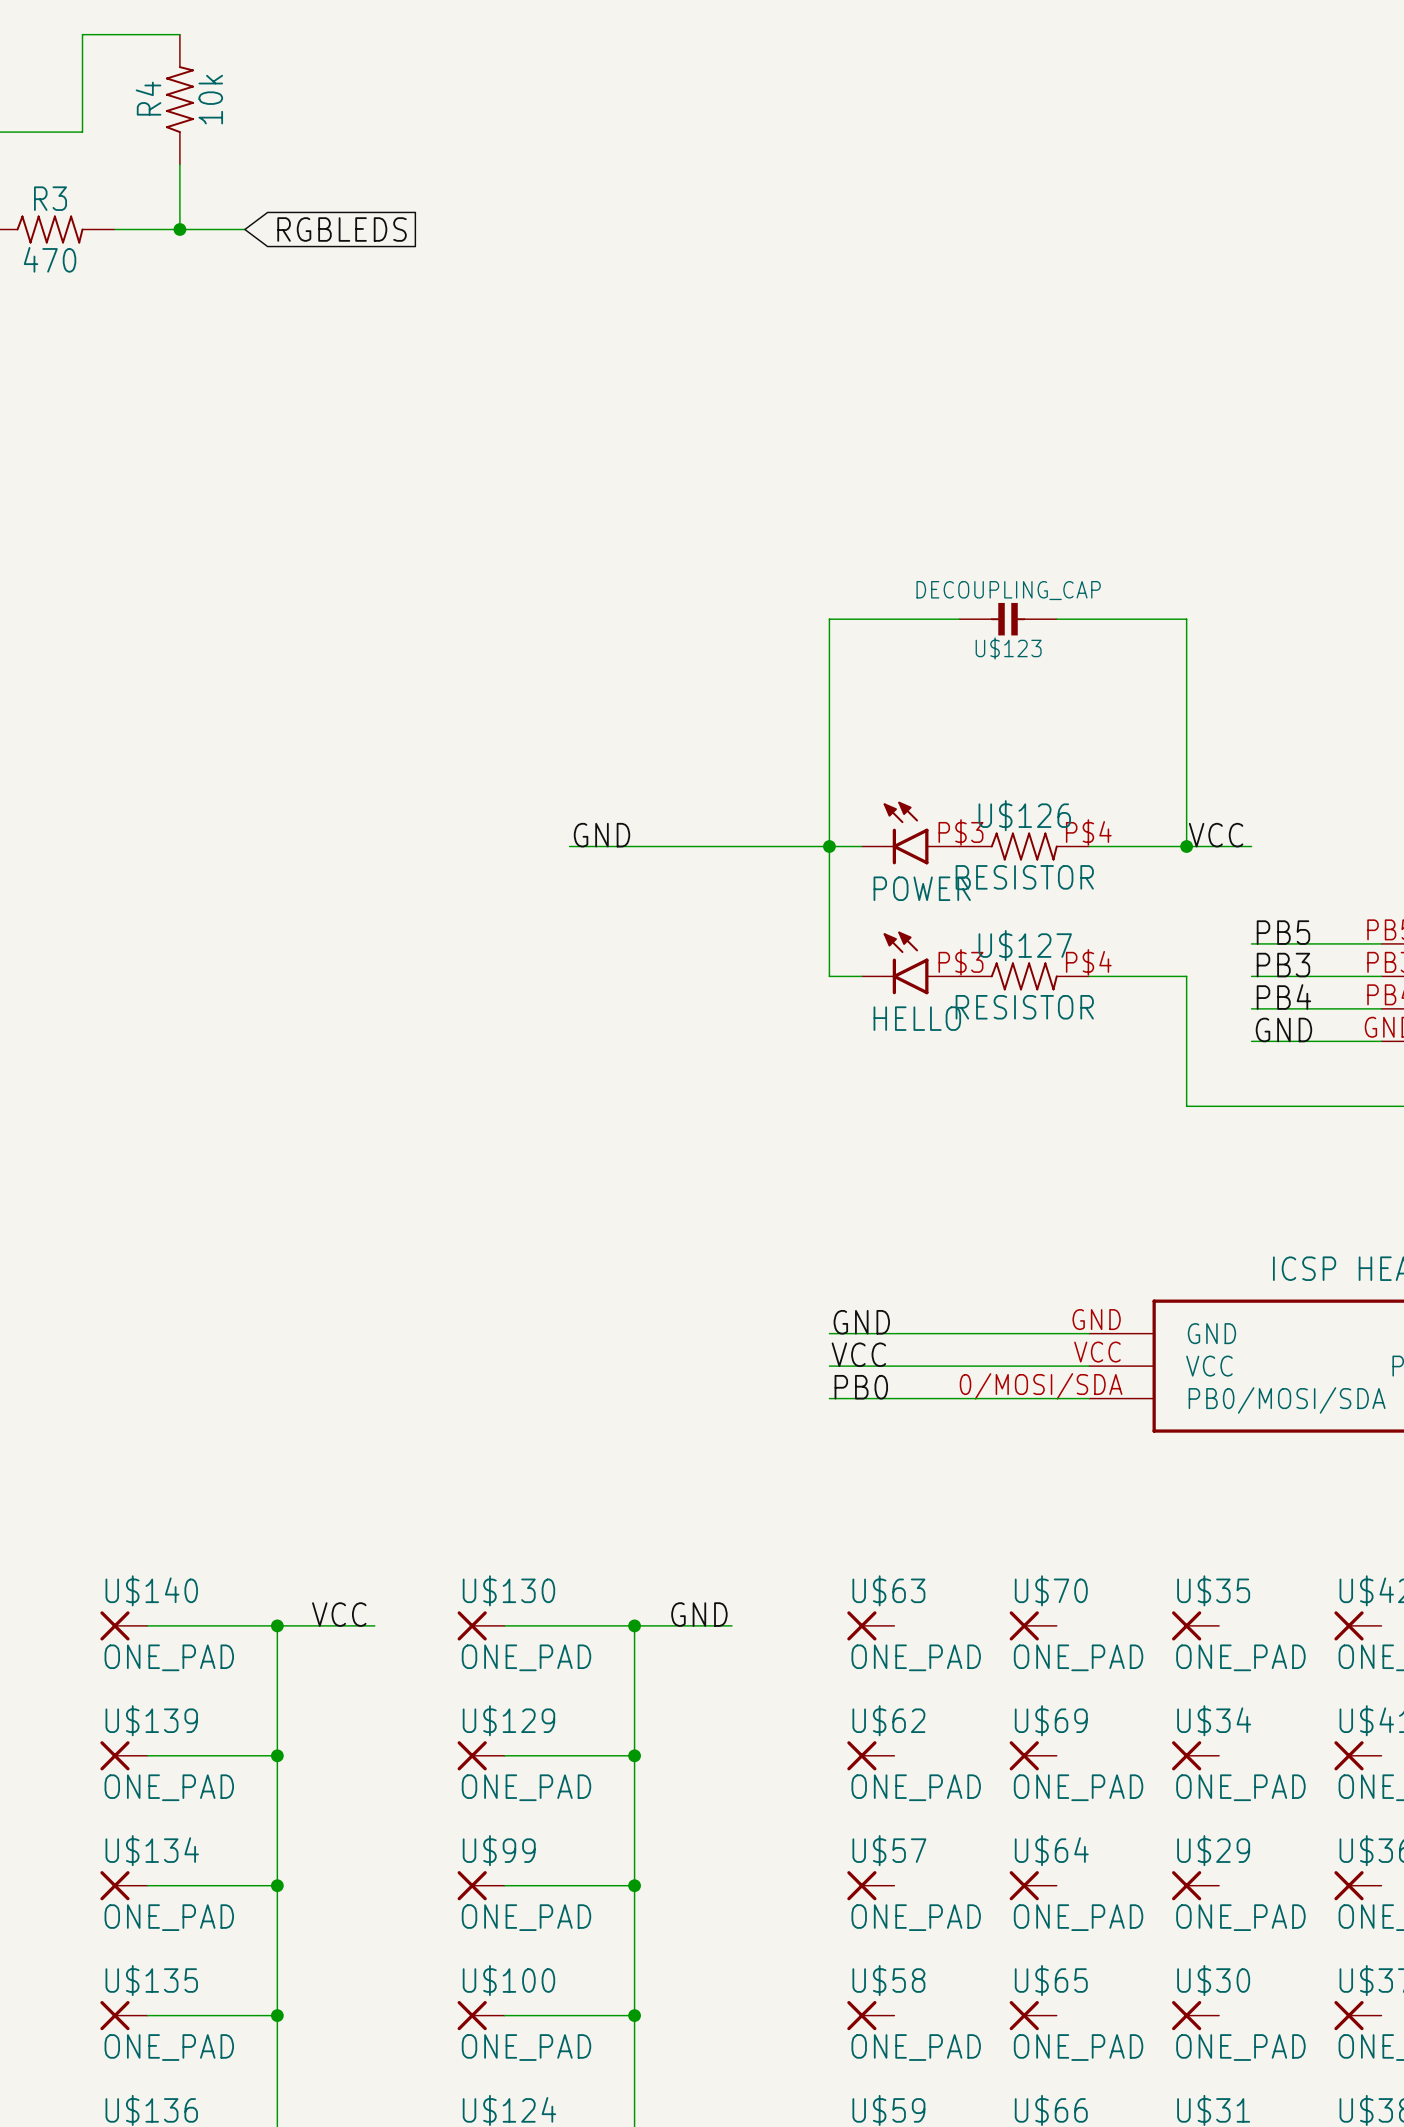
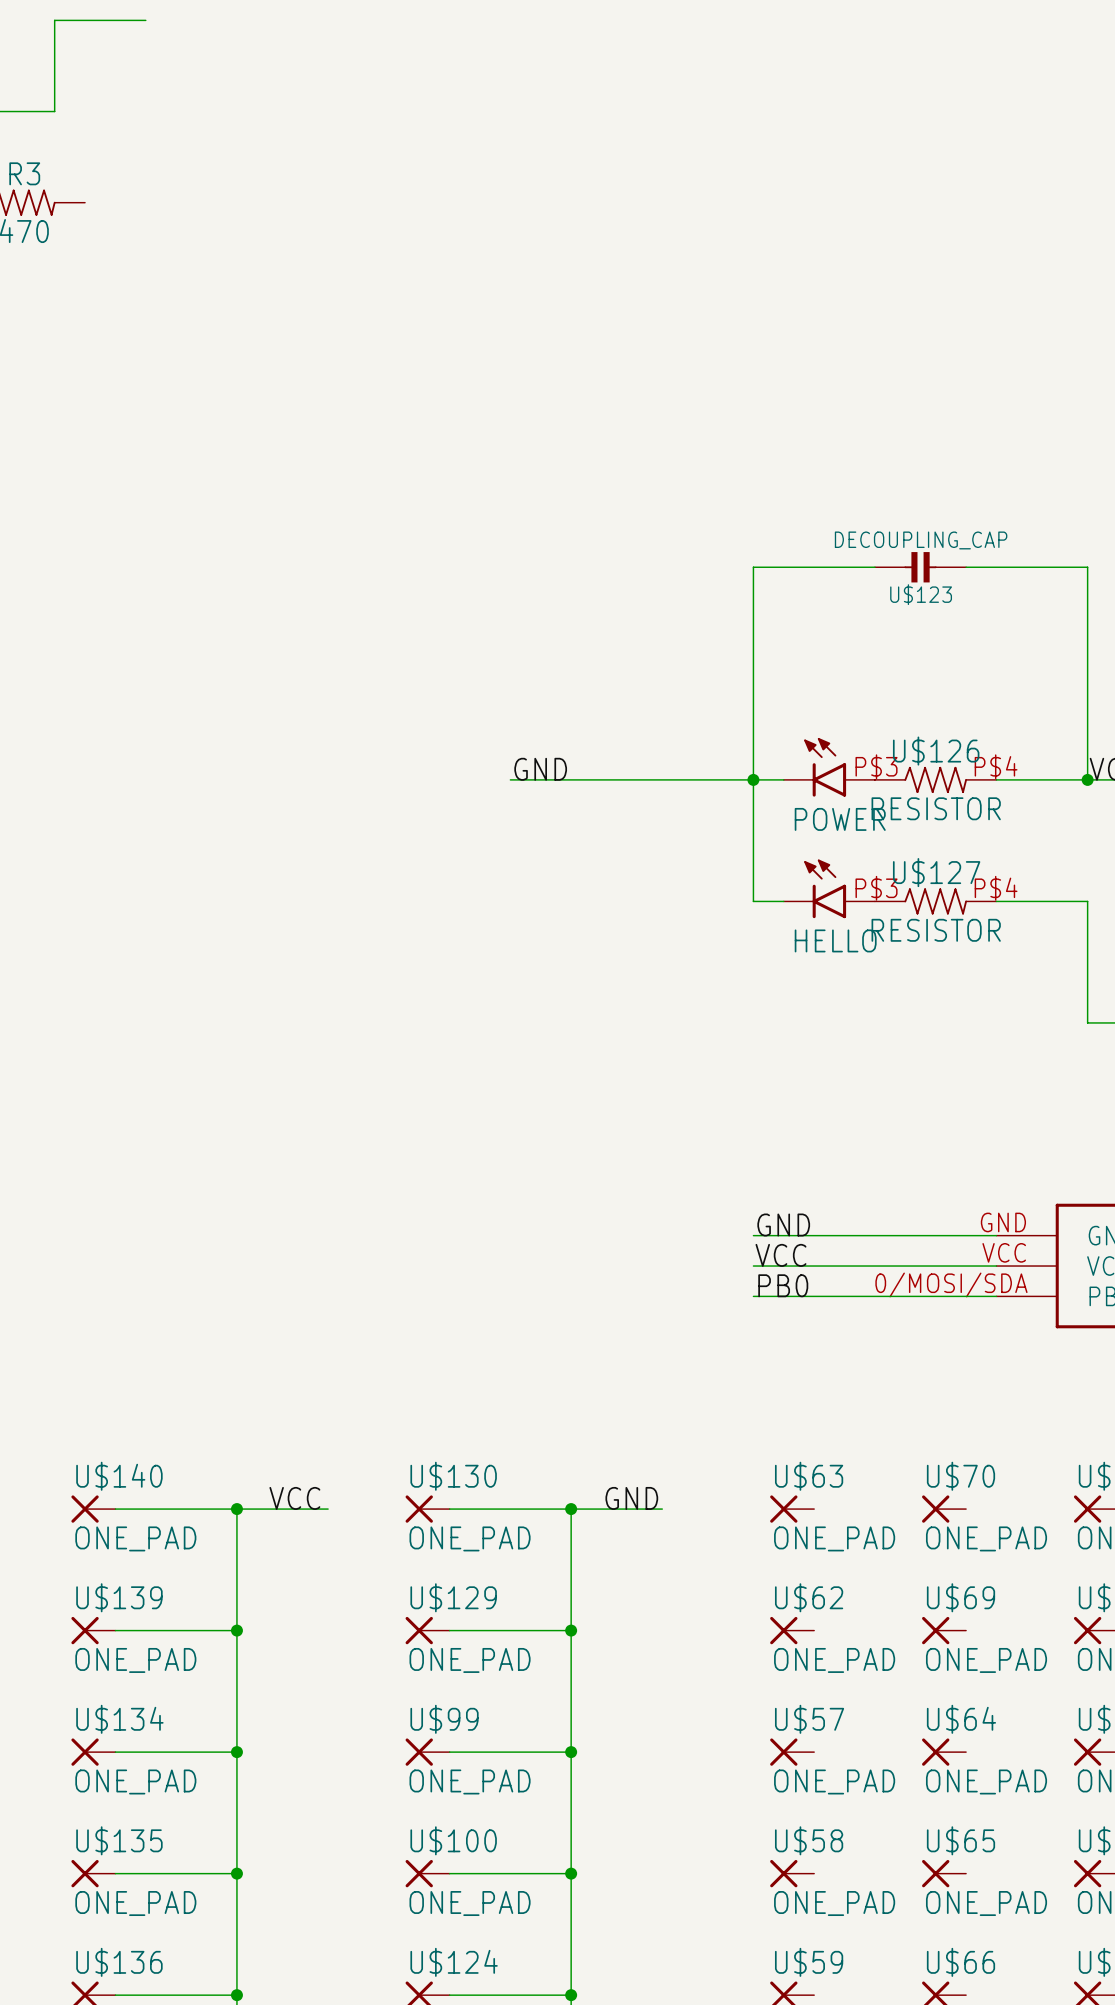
R4: 10k (179, 99) -> none
wire: (179, 164) (179, 229) -> none
wire: (114, 229) (244, 229) -> none
junction: (179, 229) -> none
global label: RGBLEDS (342, 229) -> none

